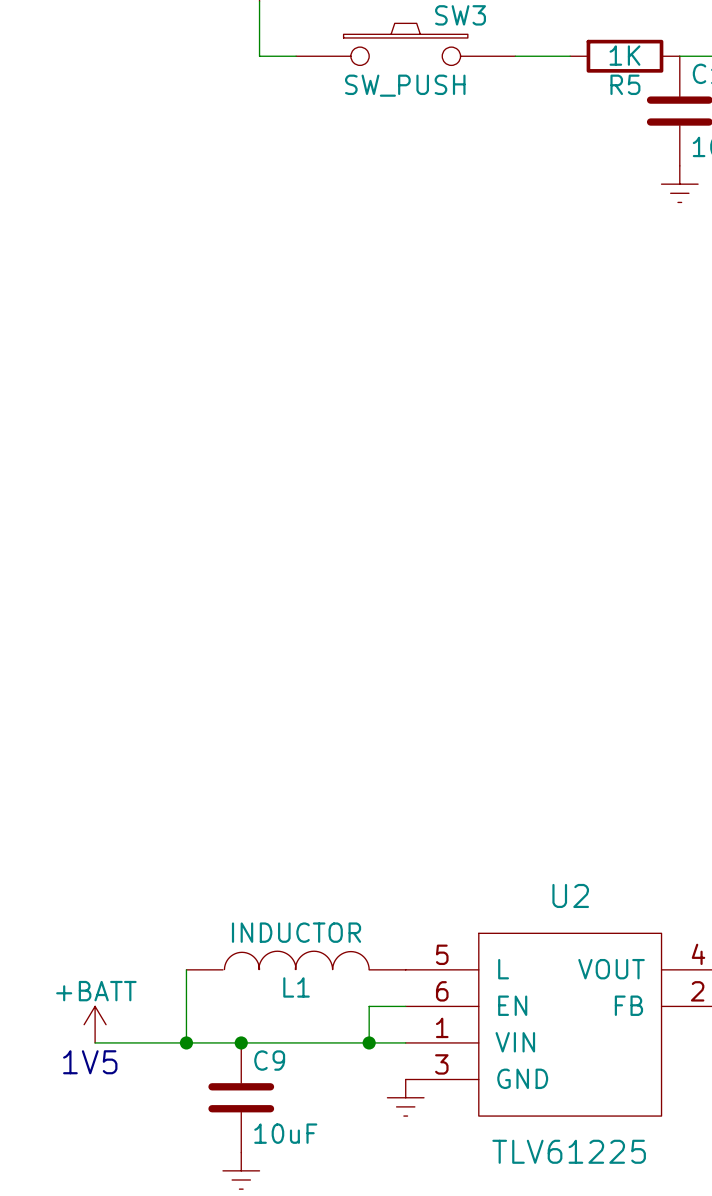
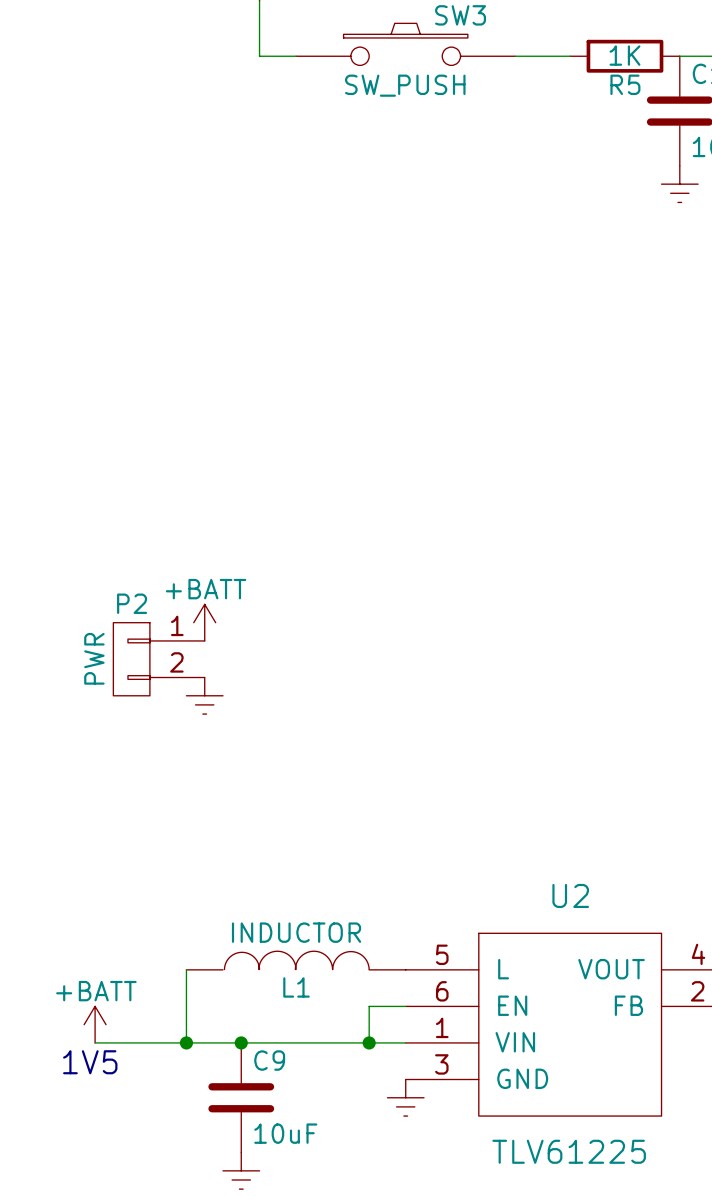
power symbol: none -> +BATT (204, 622)
P2: none -> PWR (159, 659)
power symbol: none -> (204, 695)

